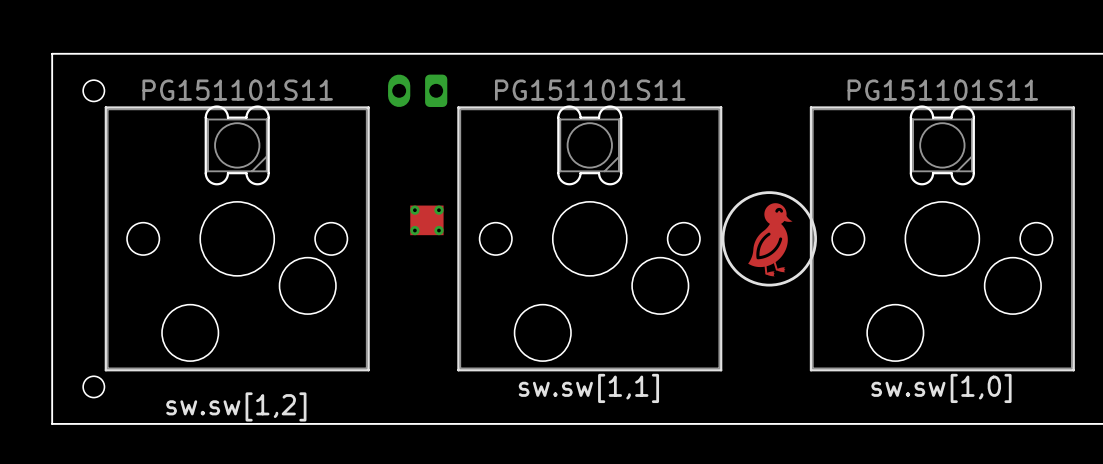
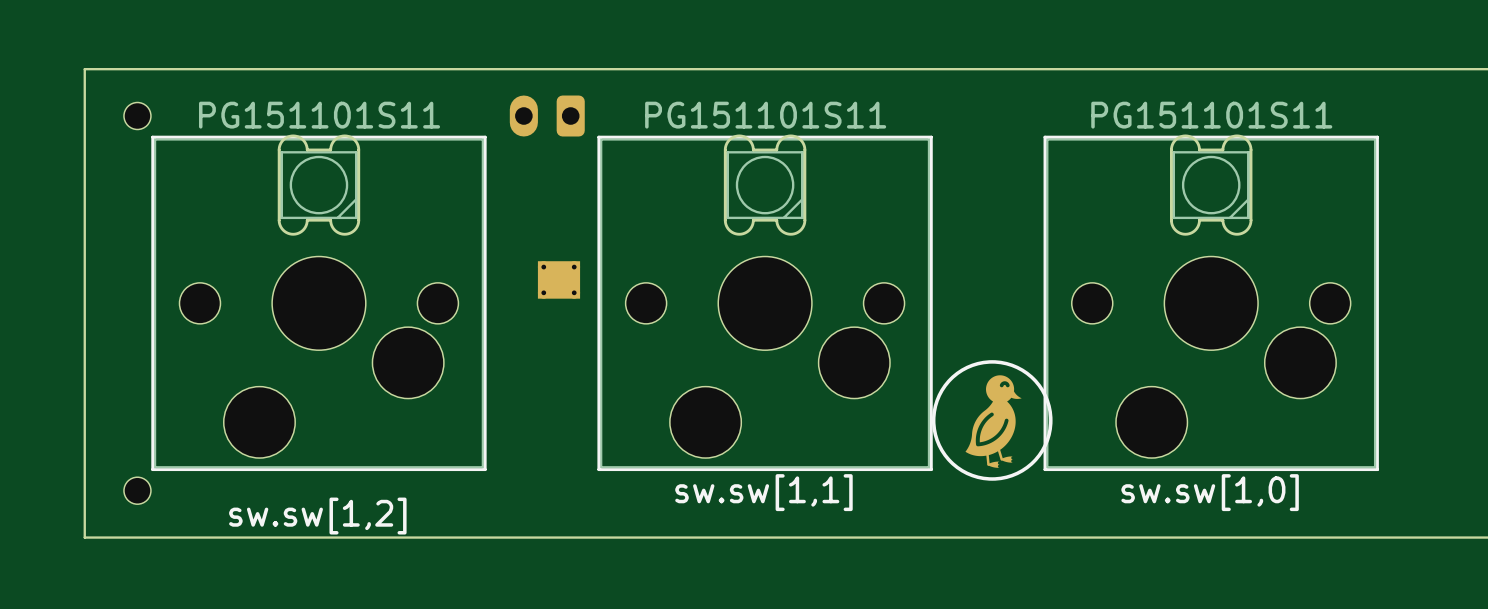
part position: (769, 238) -> (992, 420)

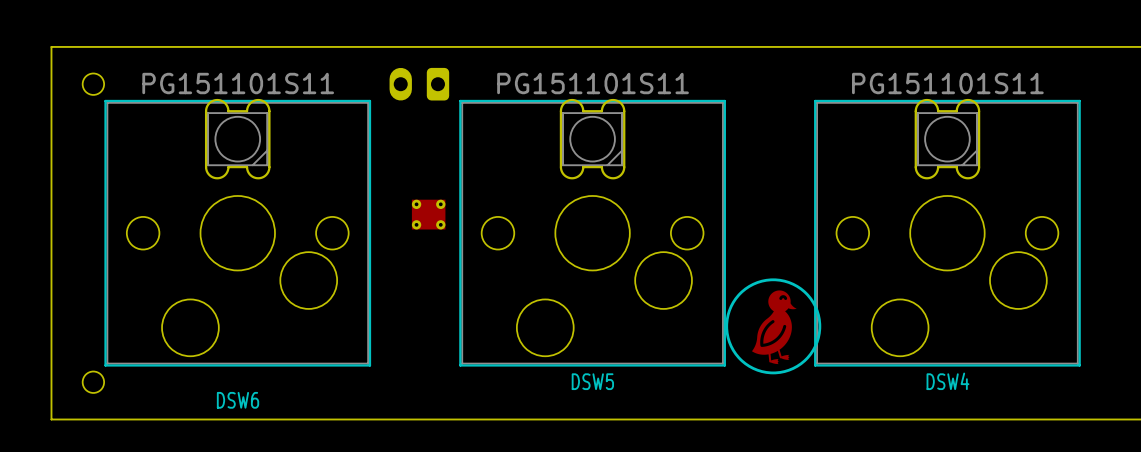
sw.sw[1,1] name: sw.sw[1,1] (763, 492) -> DSW5 (592, 381)
sw.sw[1,0] name: sw.sw[1,0] (1210, 492) -> DSW4 (947, 381)
sw.sw[1,2] name: sw.sw[1,2] (317, 516) -> DSW6 (238, 400)

